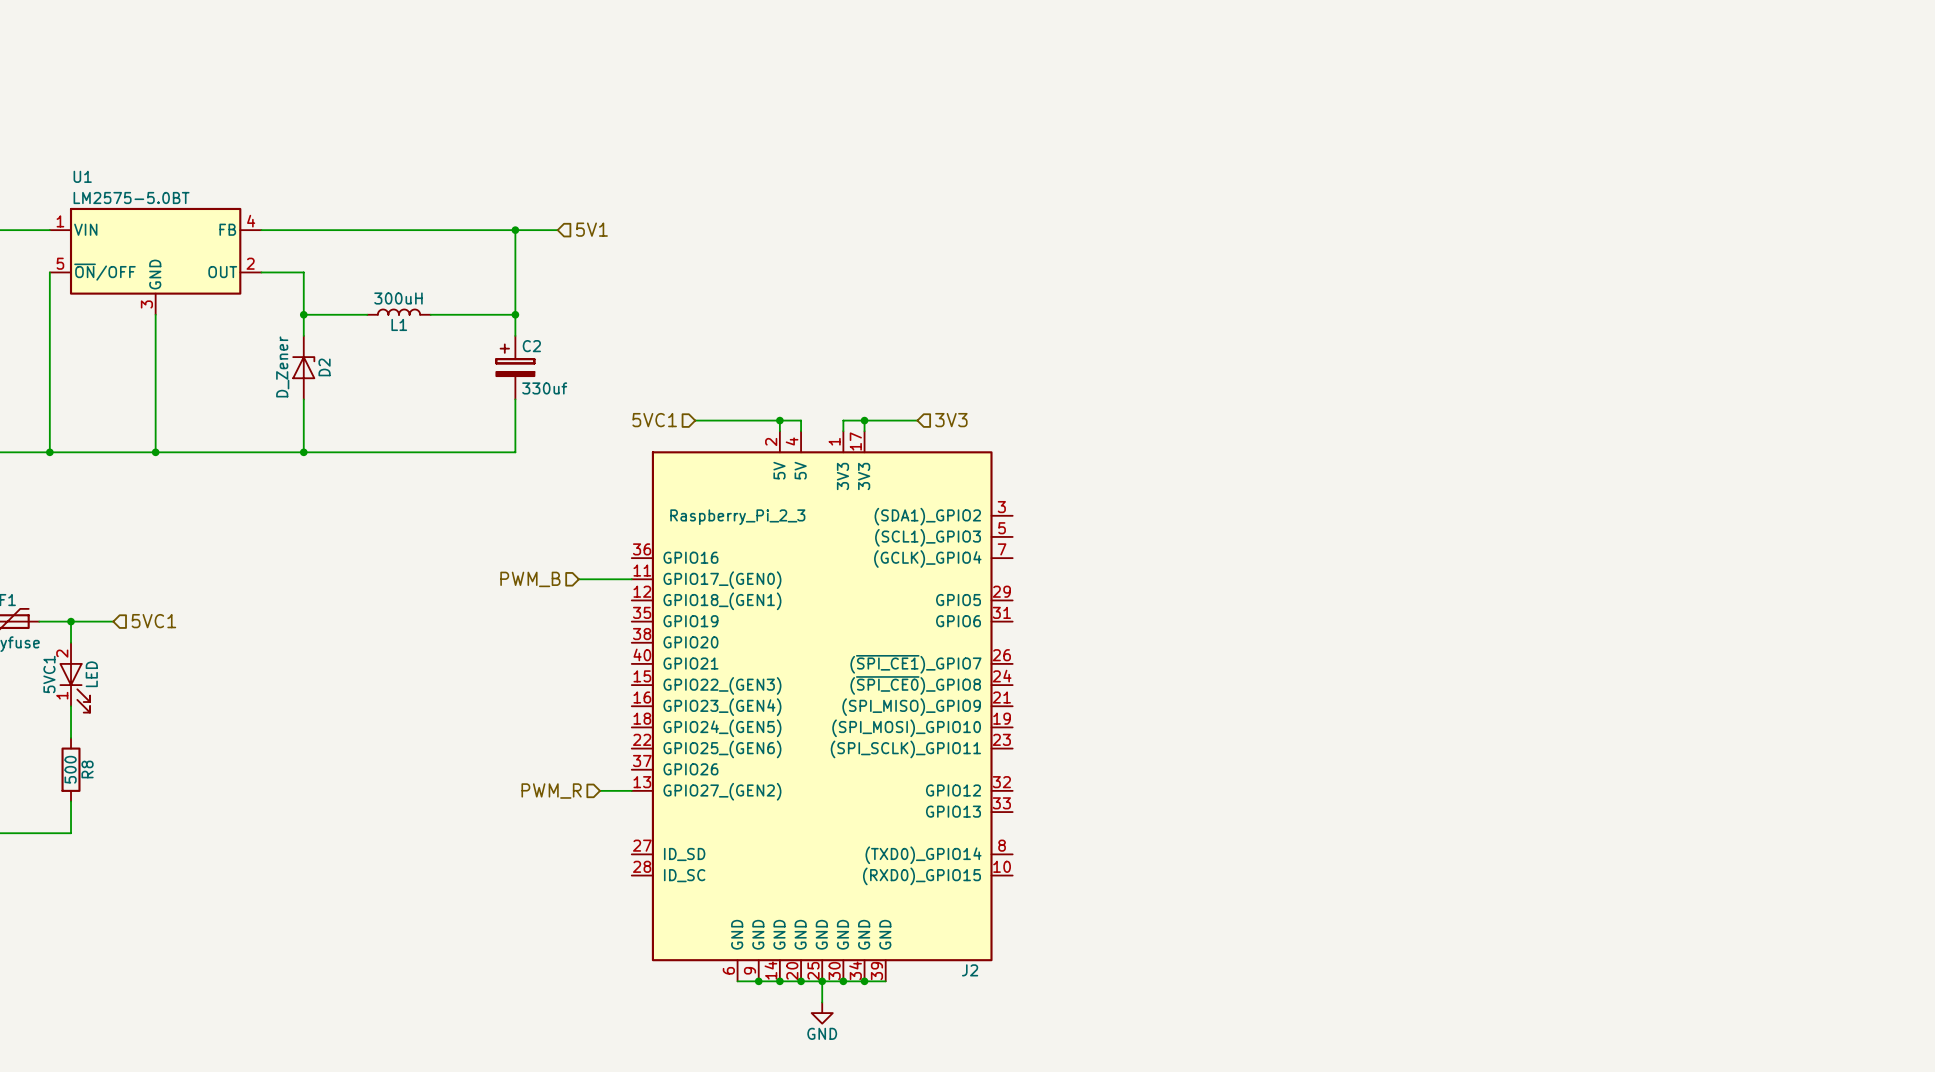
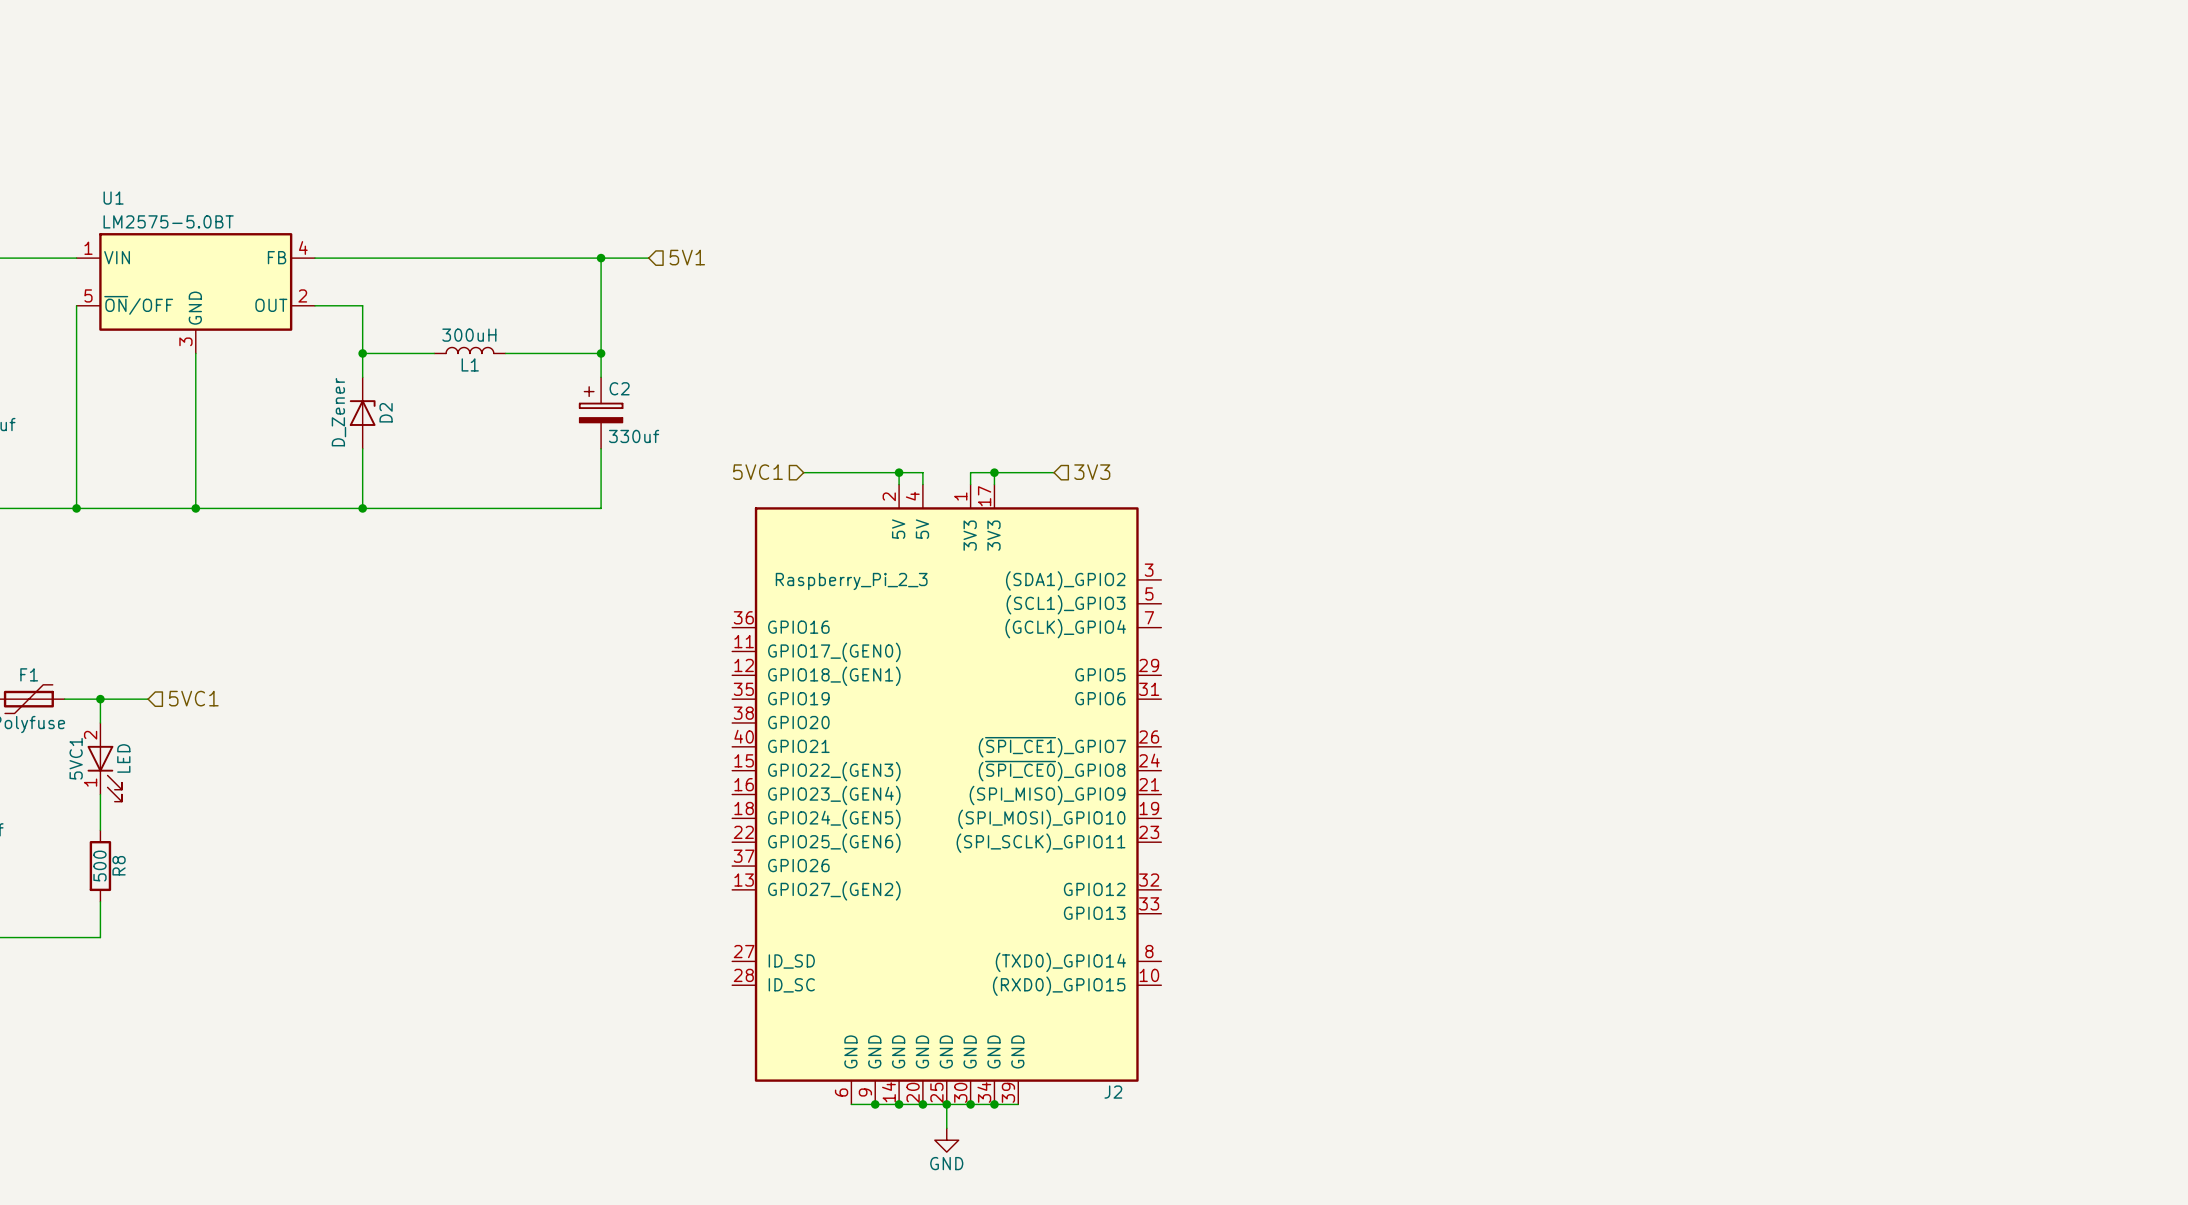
hierarchical label: PWM_B (530, 579) -> none
wire: (578, 579) (631, 579) -> none
wire: (600, 790) (631, 790) -> none
hierarchical label: PWM_R (551, 791) -> none

